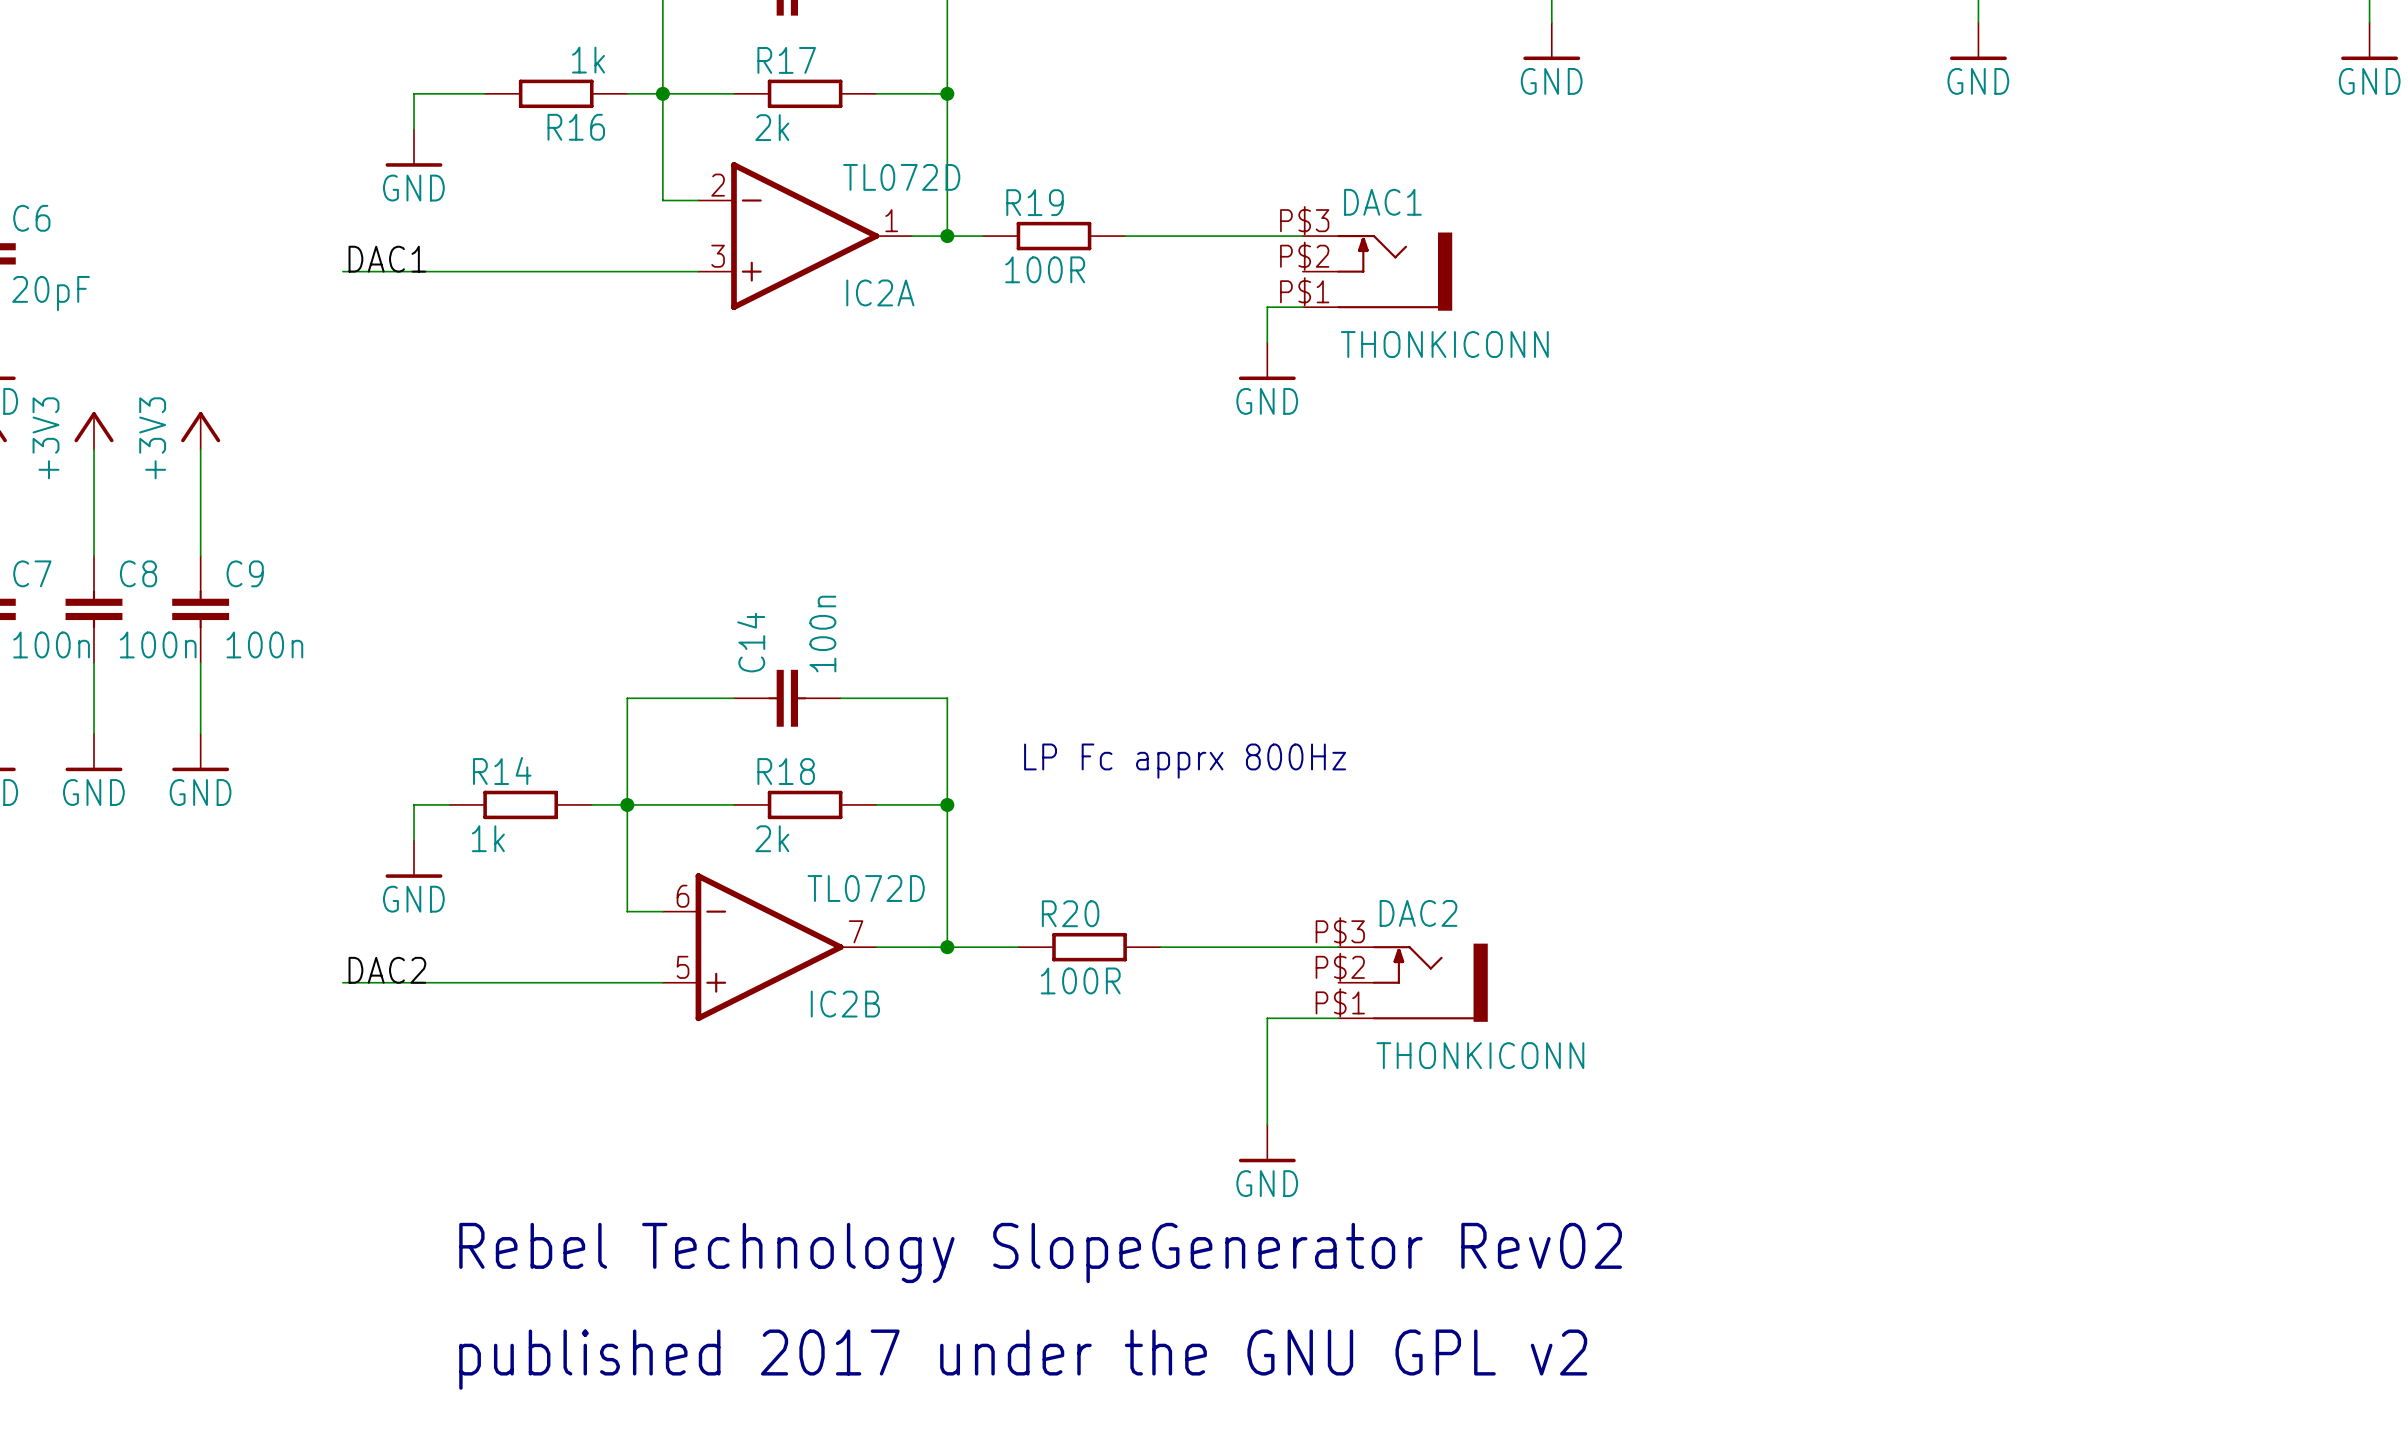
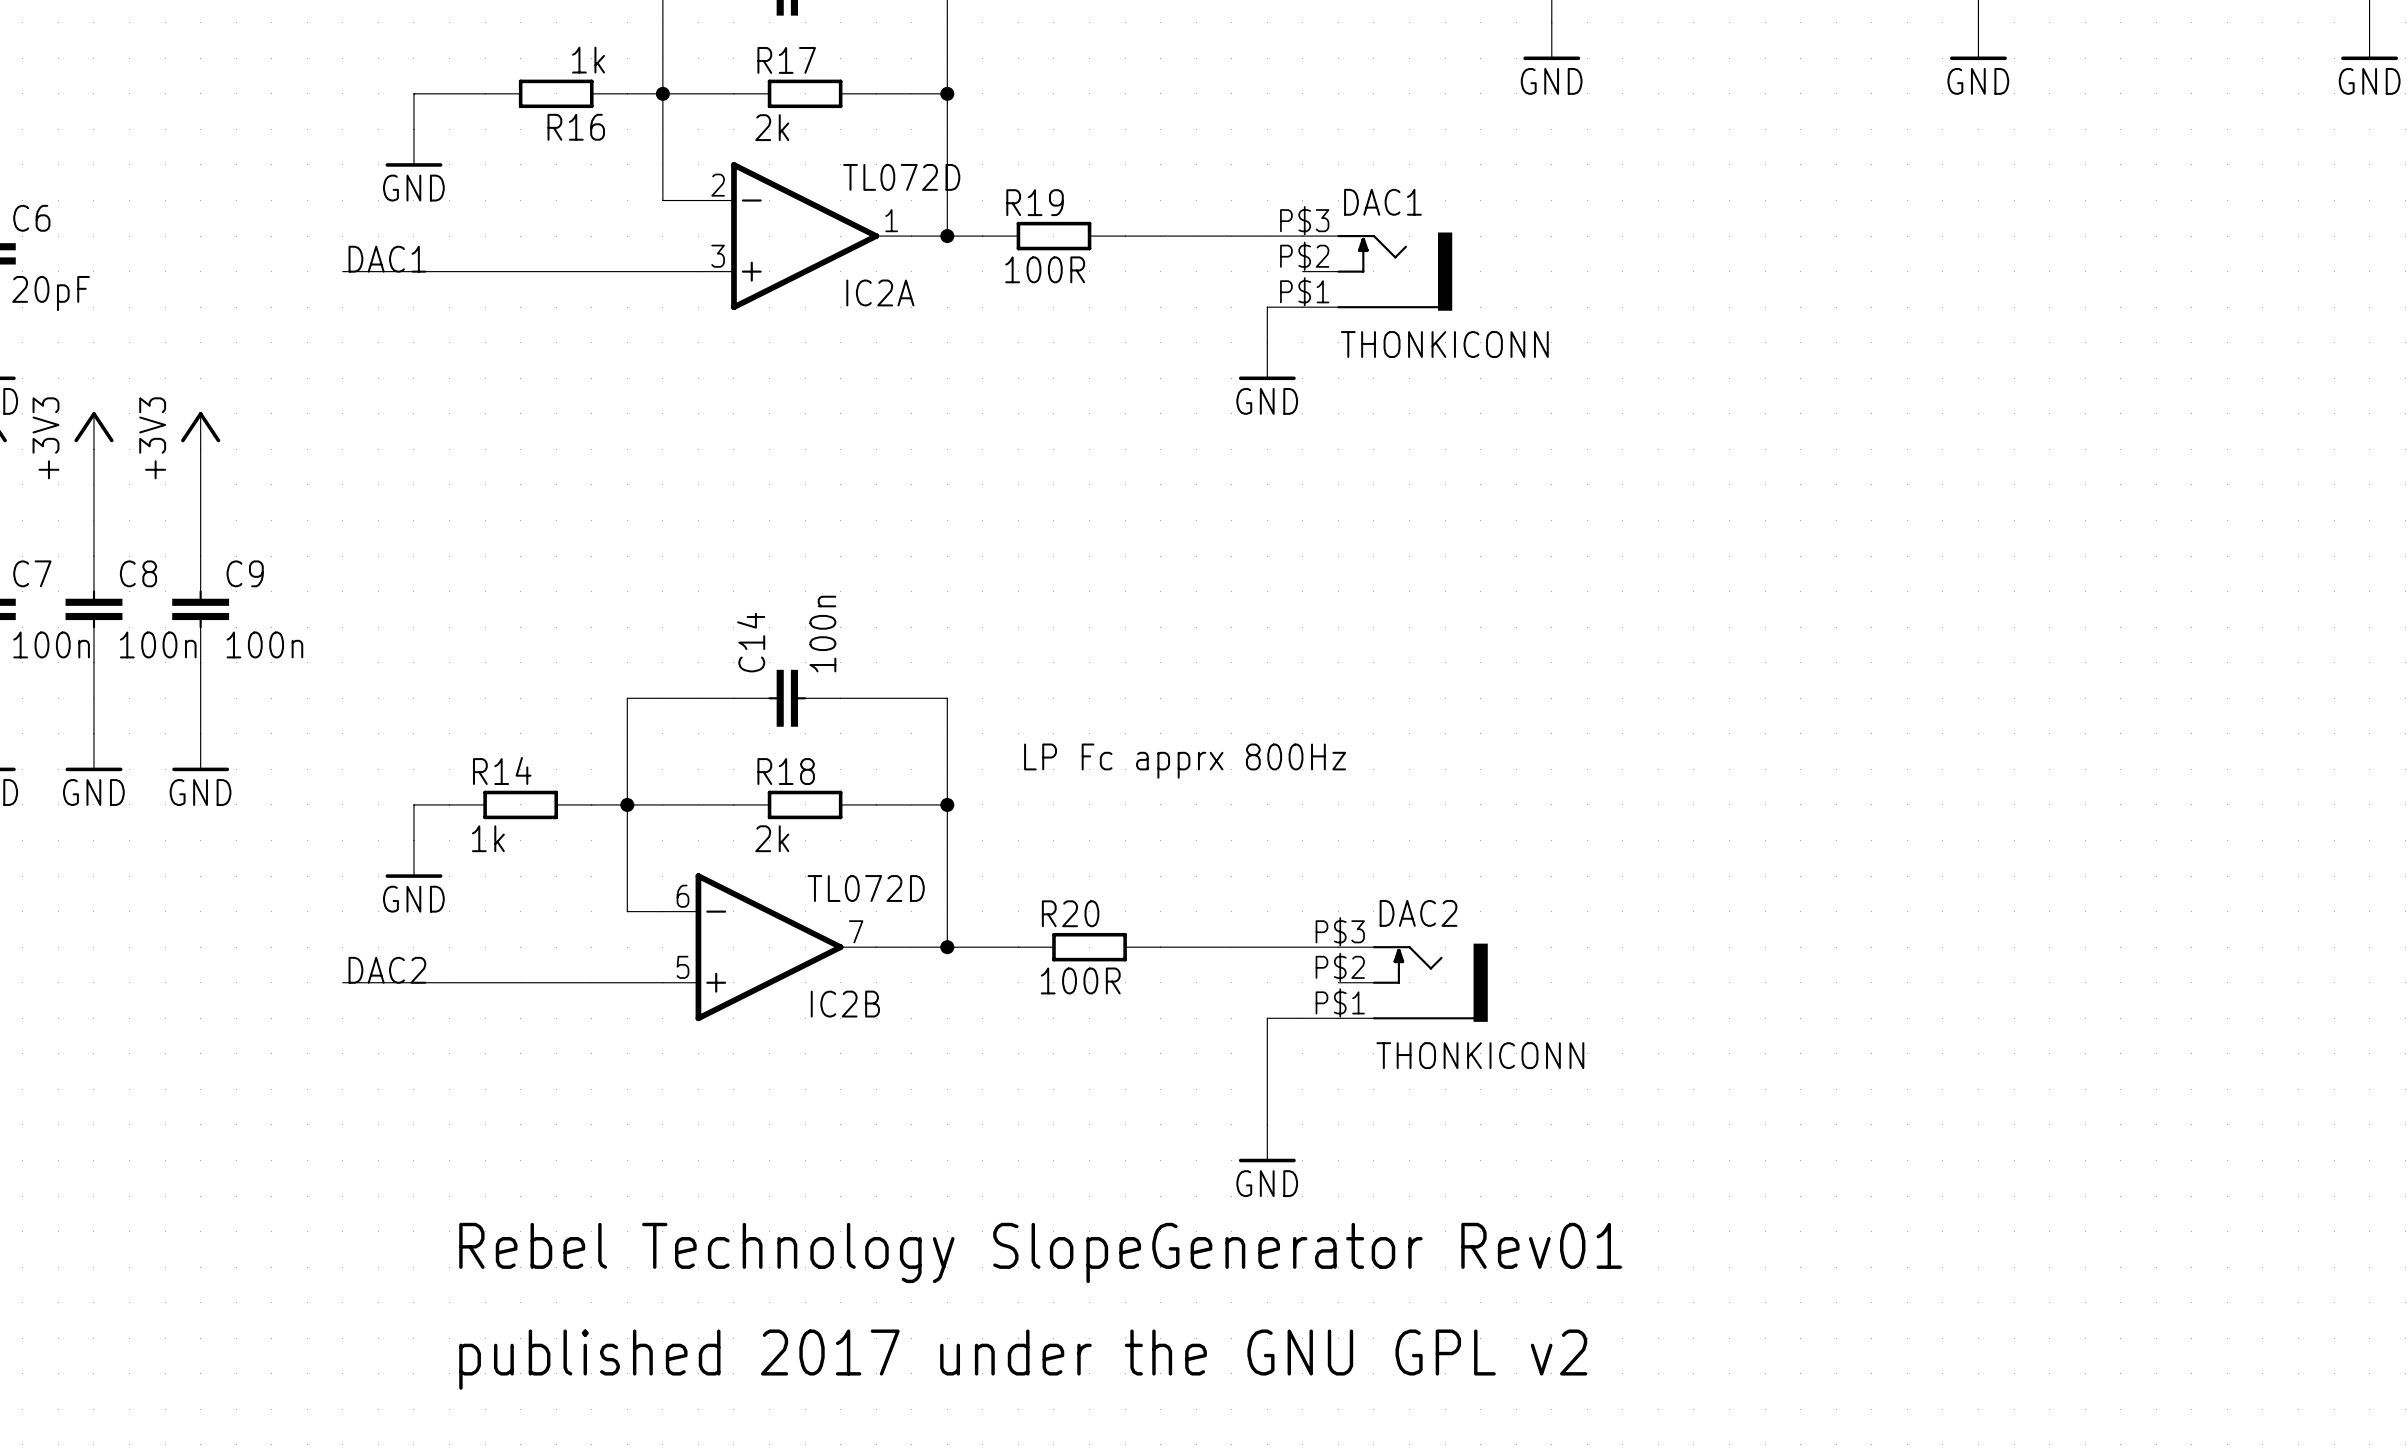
text: Rebel Technology SlopeGenerator Rev02 (1040, 1252) -> Rebel Technology SlopeGenerator Rev01 (1040, 1252)

